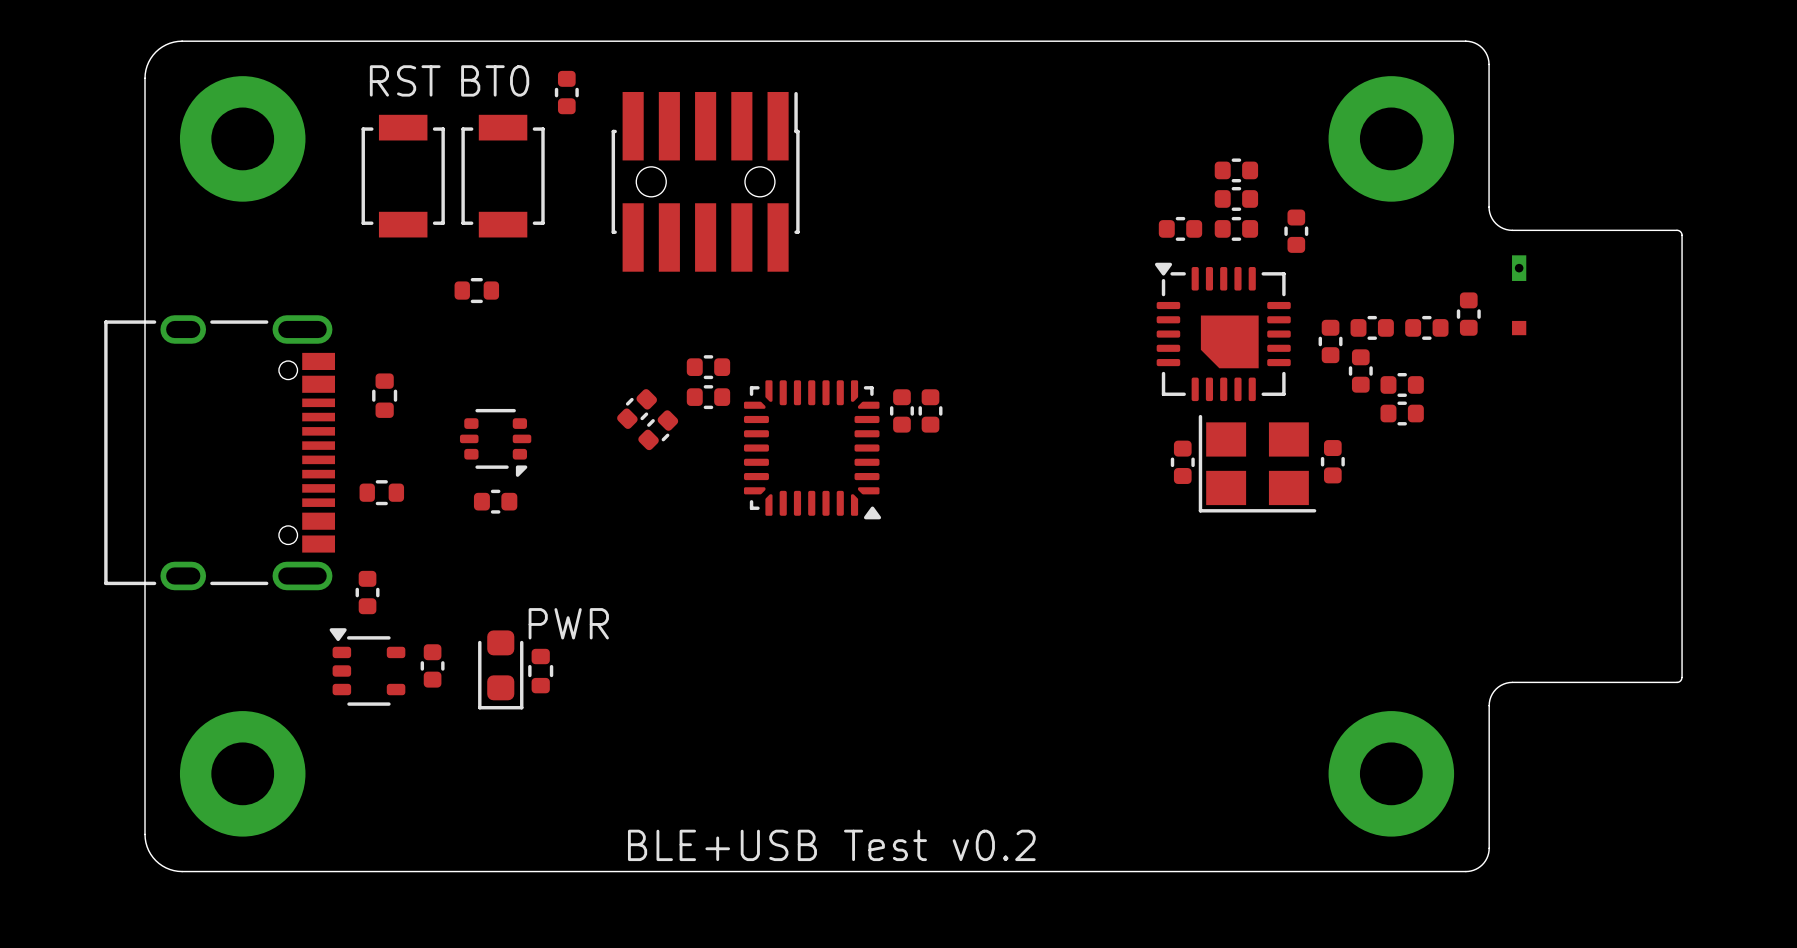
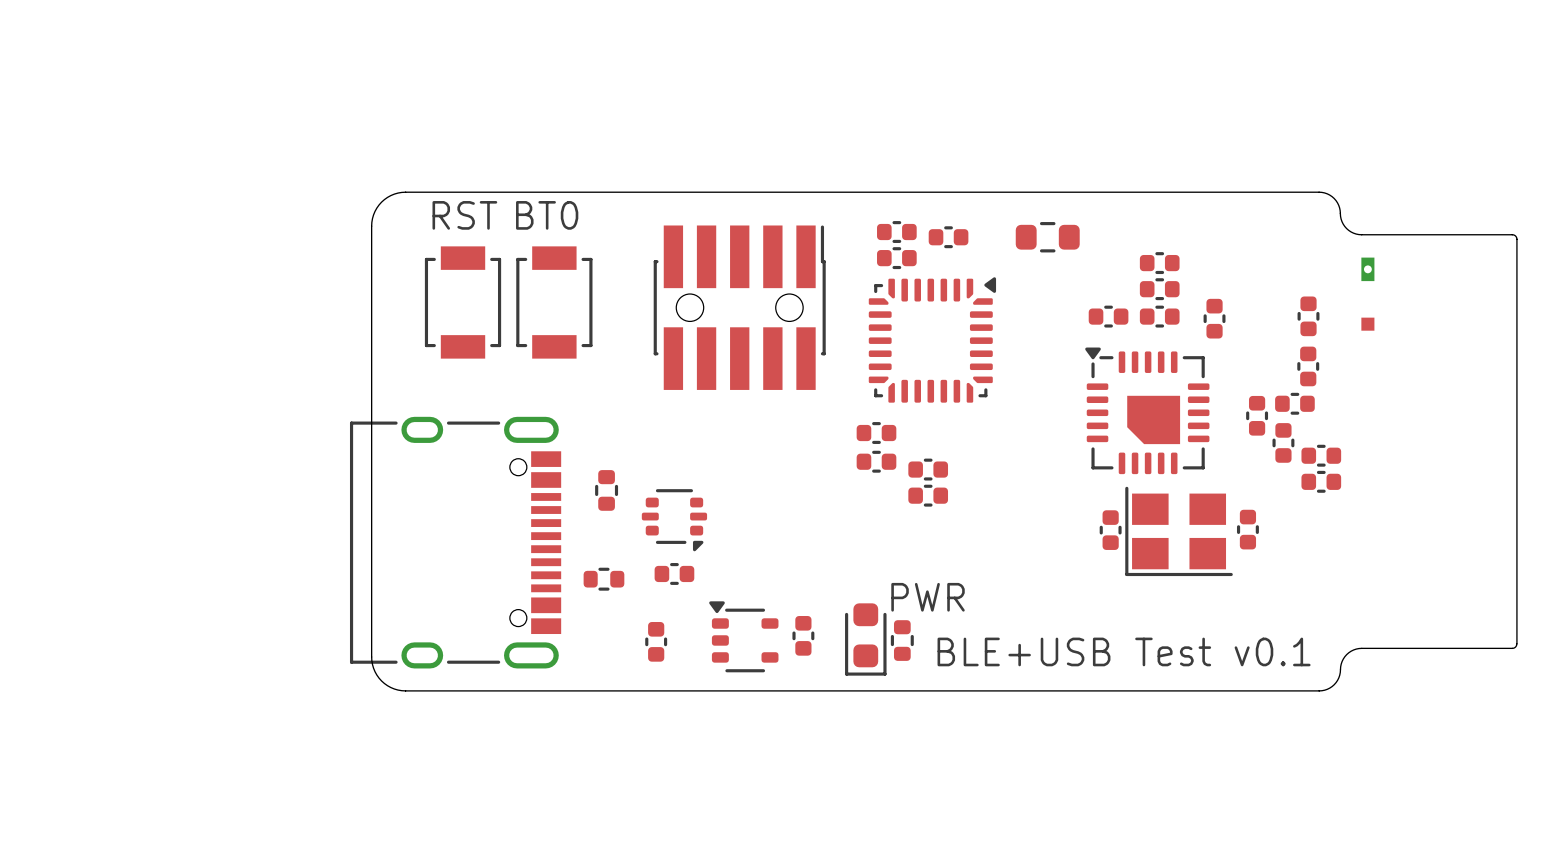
text position: RST (405, 80) -> RST (464, 215)
text position: BT0 (495, 80) -> BT0 (547, 215)
part: (566, 92) -> none
part: (242, 138) -> none
part: (1391, 138) -> none
part: (1236, 170) -> none
part: (403, 176) -> none
part: (503, 176) -> none
part position: (705, 181) -> (739, 307)
part: (1236, 198) -> none
board edge: (1489, 207) (1488, 61) (1482, 48) (1468, 41) (182, 41) (166, 44) (150, 58) (145, 78) (145, 838) (150, 854) (158, 863) (169, 869) (182, 871) (1468, 871) (1482, 864) (1489, 850) (1489, 705) -> (1340, 213) (1338, 205) (1334, 198) (1327, 193) (1319, 192) (405, 192) (390, 195) (376, 208) (371, 226) (371, 656) (375, 671) (381, 680) (390, 687) (405, 690) (1319, 690) (1327, 689) (1334, 684) (1338, 677) (1340, 669)
part footprint: [1158, 216, 1203, 241] -> [1015, 222, 1080, 253]
part: none -> (896, 232)
part: (1236, 228) -> none
part: (1296, 231) -> none
part: none -> (948, 237)
part: none -> (896, 258)
part: none -> (1159, 263)
part footprint: [1154, 262, 1291, 402] -> [1088, 305, 1129, 328]
part: none -> (1159, 289)
part: (476, 290) -> none
part: none -> (463, 302)
part: none -> (554, 302)
part: (1468, 314) -> none
part: none -> (1159, 316)
part: none -> (1308, 316)
part: none -> (1214, 318)
part: (1372, 327) -> none
part: (1426, 327) -> none
part: (1330, 341) -> none
part: (708, 367) -> none
part: (1360, 371) -> none
part: none -> (1308, 366)
part: (1402, 384) -> none
part: (384, 395) -> none
part: (708, 397) -> none
part: (637, 409) -> none
part: (901, 410) -> none
part: (930, 410) -> none
part rotation: 0° (1402, 413) -> 90° clockwise (1257, 415)
part: none -> (1294, 403)
part: none -> (1147, 410)
part: (658, 430) -> none
part position: (495, 442) -> (674, 520)
part: none -> (876, 433)
part rotation: 0° (812, 449) -> 90° counterclockwise (932, 339)
part position: (812, 449) -> (932, 339)
part position: (219, 452) -> (455, 542)
part: none -> (1283, 442)
part: (1332, 461) -> none
part: (1182, 462) -> none
part position: (1257, 463) -> (1179, 531)
part: none -> (1321, 455)
part: none -> (876, 461)
part: none -> (928, 469)
part: (381, 492) -> none
part: none -> (1321, 481)
part: (495, 501) -> none
part: none -> (606, 490)
part: none -> (928, 495)
part: none -> (1247, 529)
part: none -> (1110, 530)
part: (367, 592) -> none
part: none -> (674, 573)
part: none -> (603, 579)
text position: PWR (568, 623) -> PWR (928, 597)
part: (432, 665) -> none
part position: (367, 666) -> (743, 636)
part: none -> (803, 635)
part position: (500, 669) -> (865, 639)
part: (540, 671) -> none
part: none -> (902, 640)
part: none -> (656, 641)
text: none -> BLE+USB Test v0.1 (1124, 651)
part: (242, 773) -> none
part: (1391, 773) -> none
text: BLE+USB Test v0.2 (831, 845) -> none

